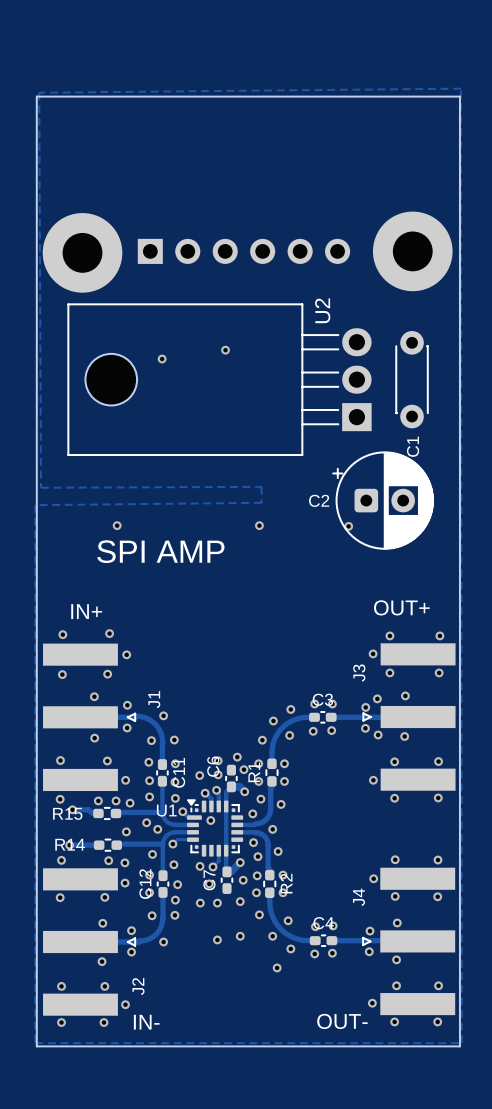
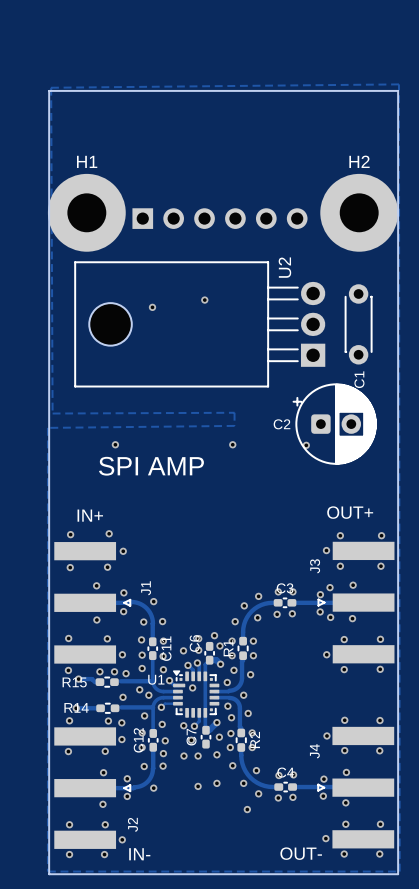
H1: none -> (86, 212)
H2: none -> (359, 212)
part: (412, 251) -> none
part: (82, 252) -> none

